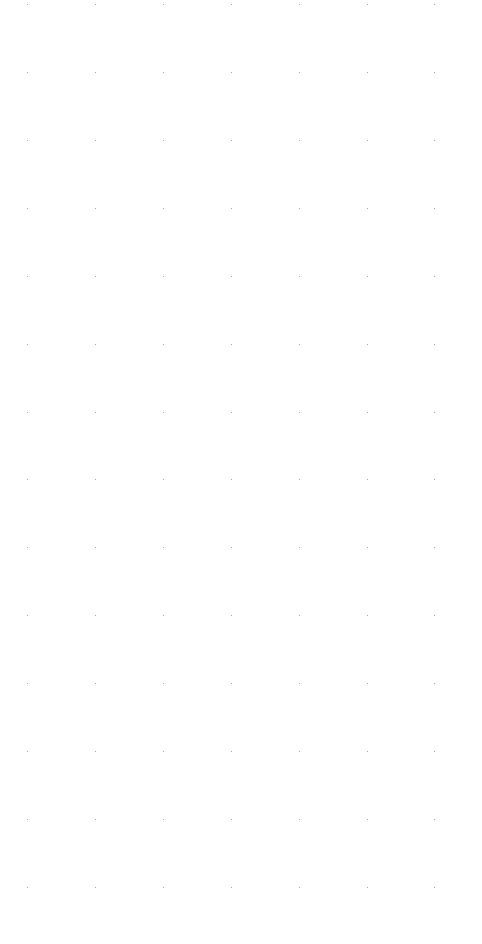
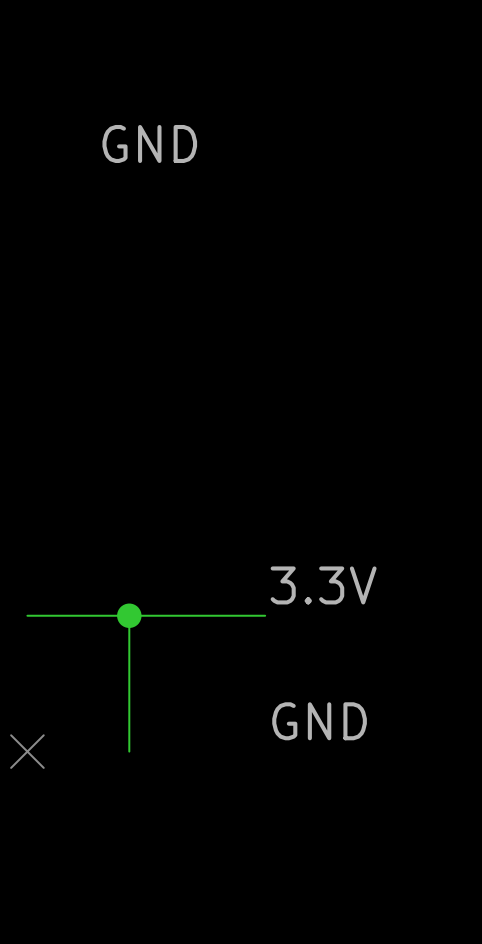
label: none -> GND (149, 143)
label: none -> 3.3V (323, 585)
wire: none -> (27, 615) (265, 615)
wire: none -> (129, 615) (129, 751)
junction: none -> (129, 615)
label: none -> GND (319, 721)
no-connect mark: none -> (27, 751)

